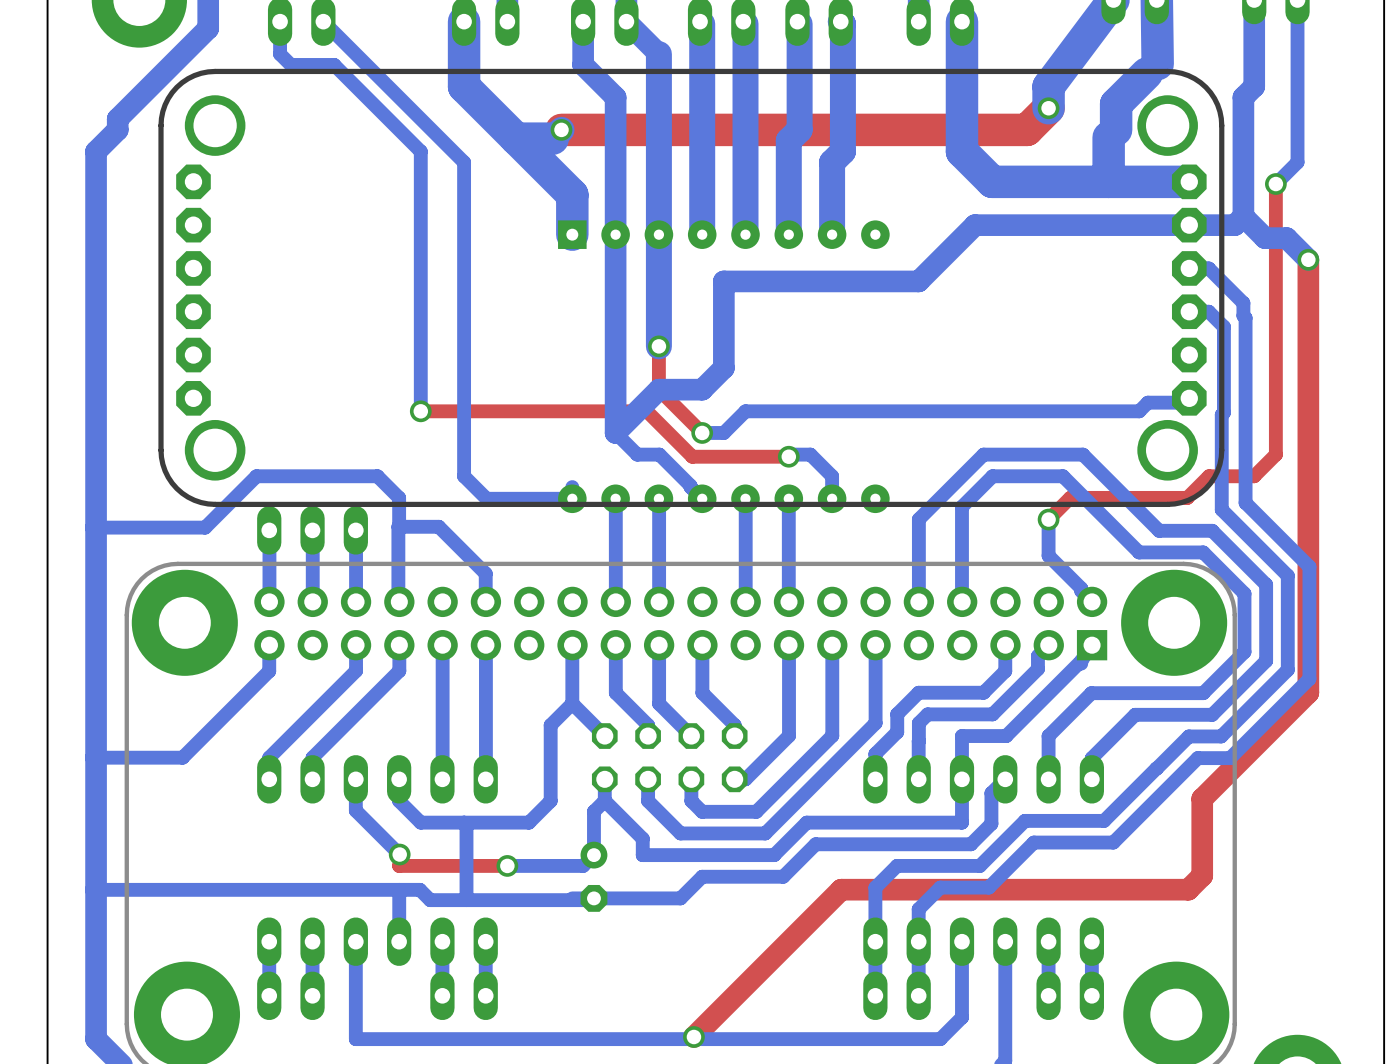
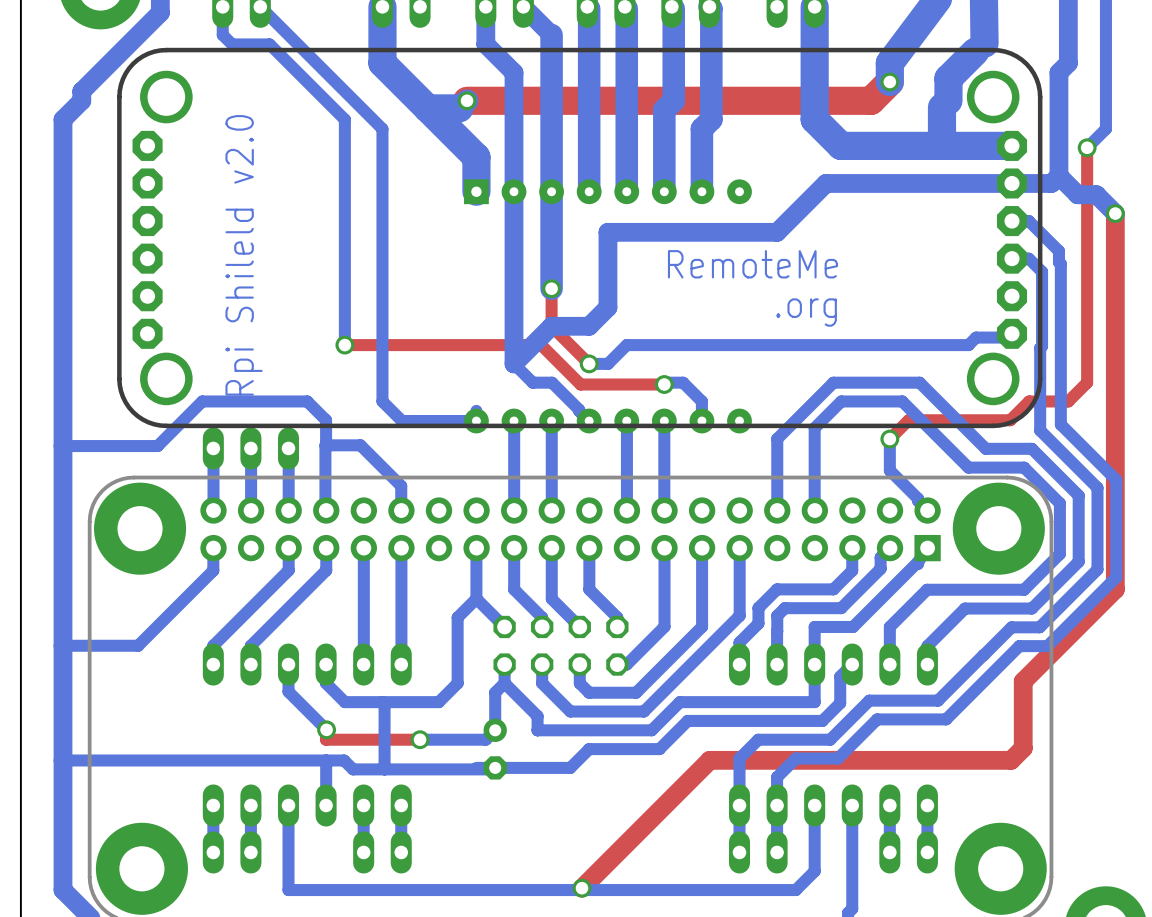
text: none -> Rpi Shileld v2.0 (244, 255)
text: none -> RemoteMe (752, 264)
text: none -> .org (806, 312)

